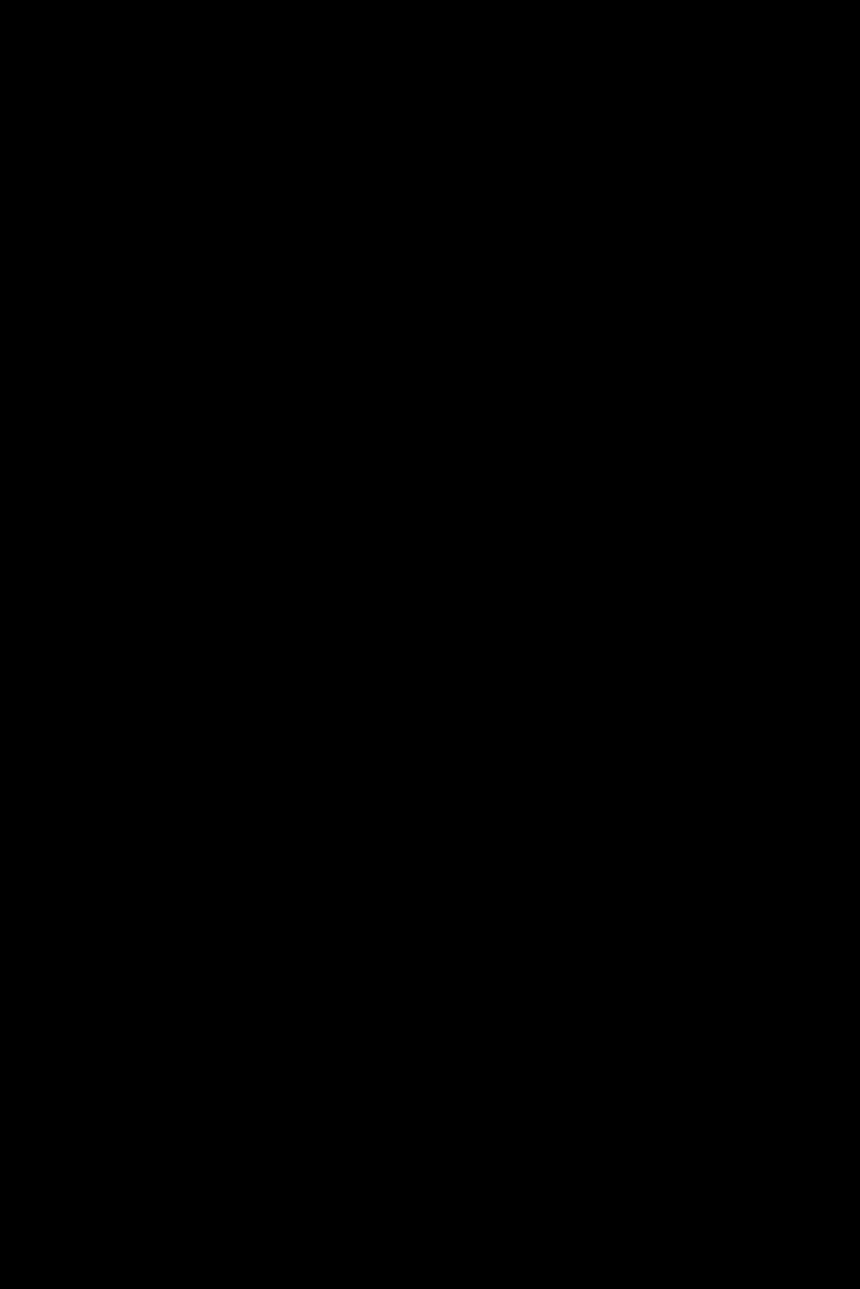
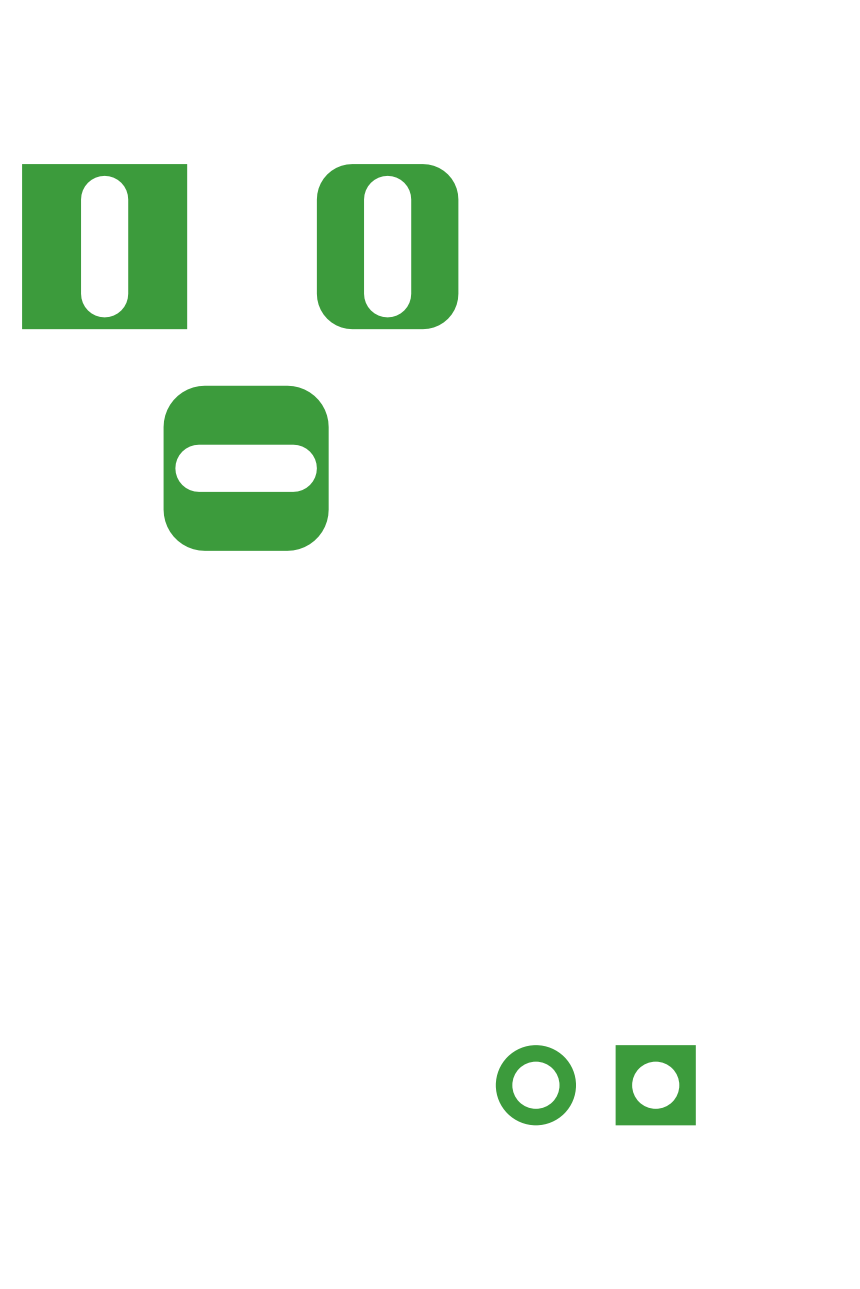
part: none -> (240, 357)
part: none -> (595, 1085)

